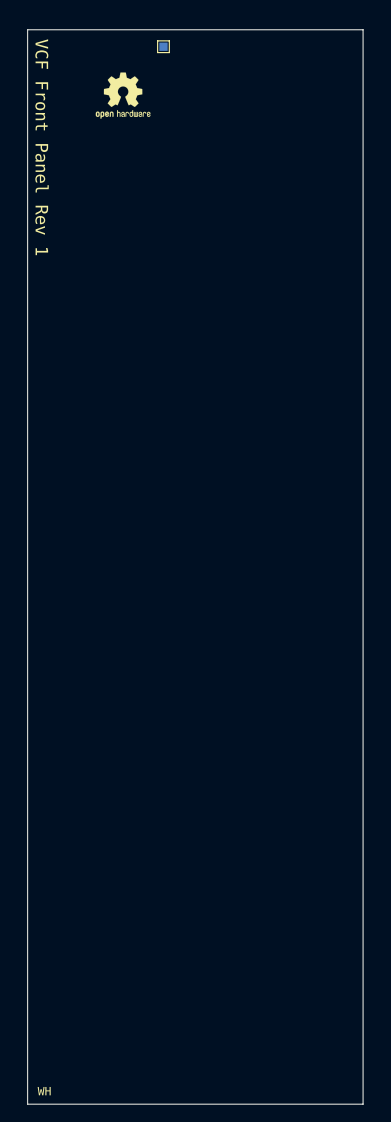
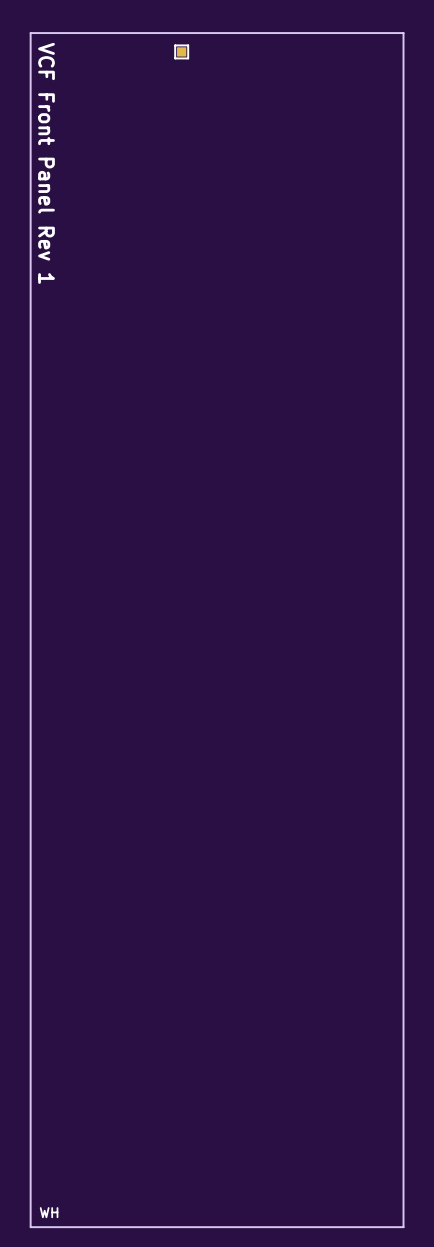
drawing: [95, 72, 151, 119] -> none

